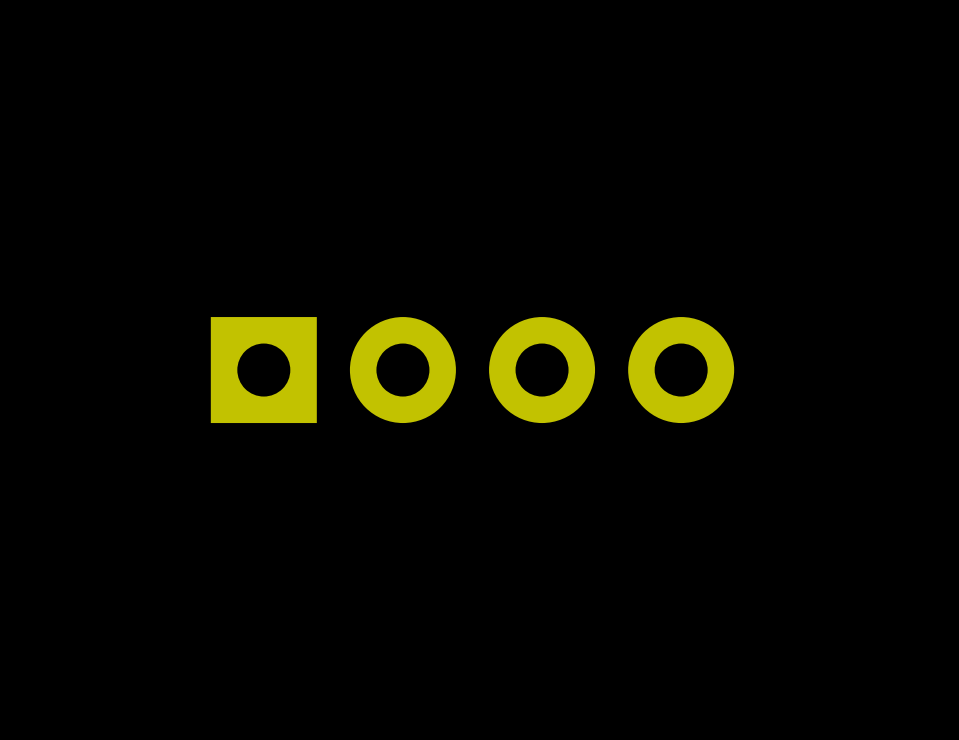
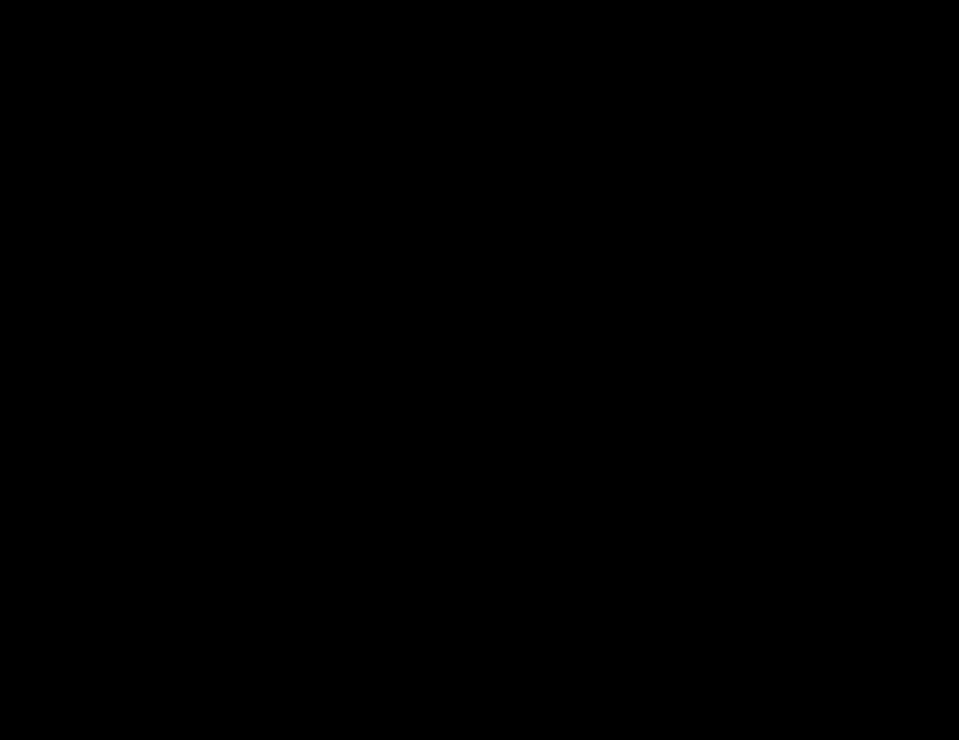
part: (472, 370) -> none

